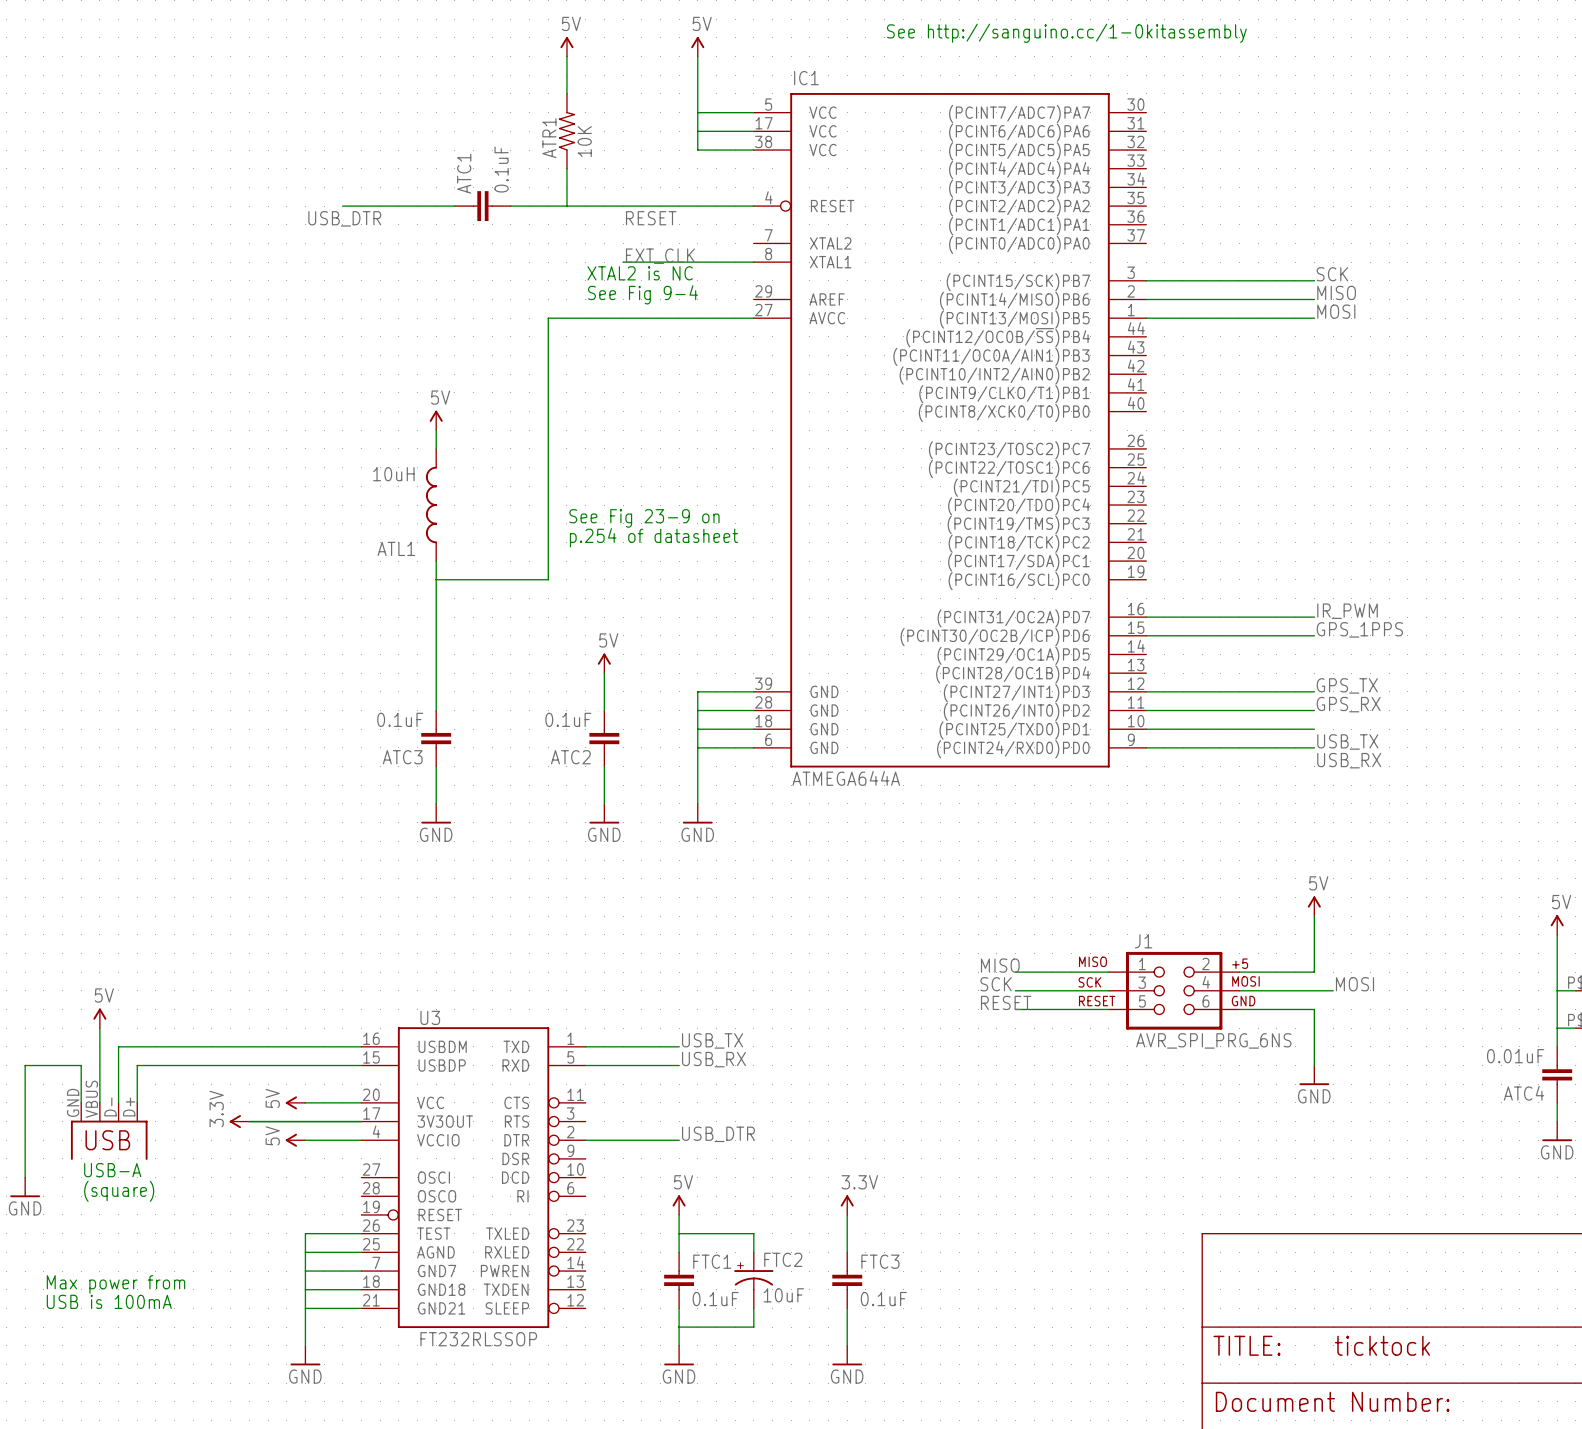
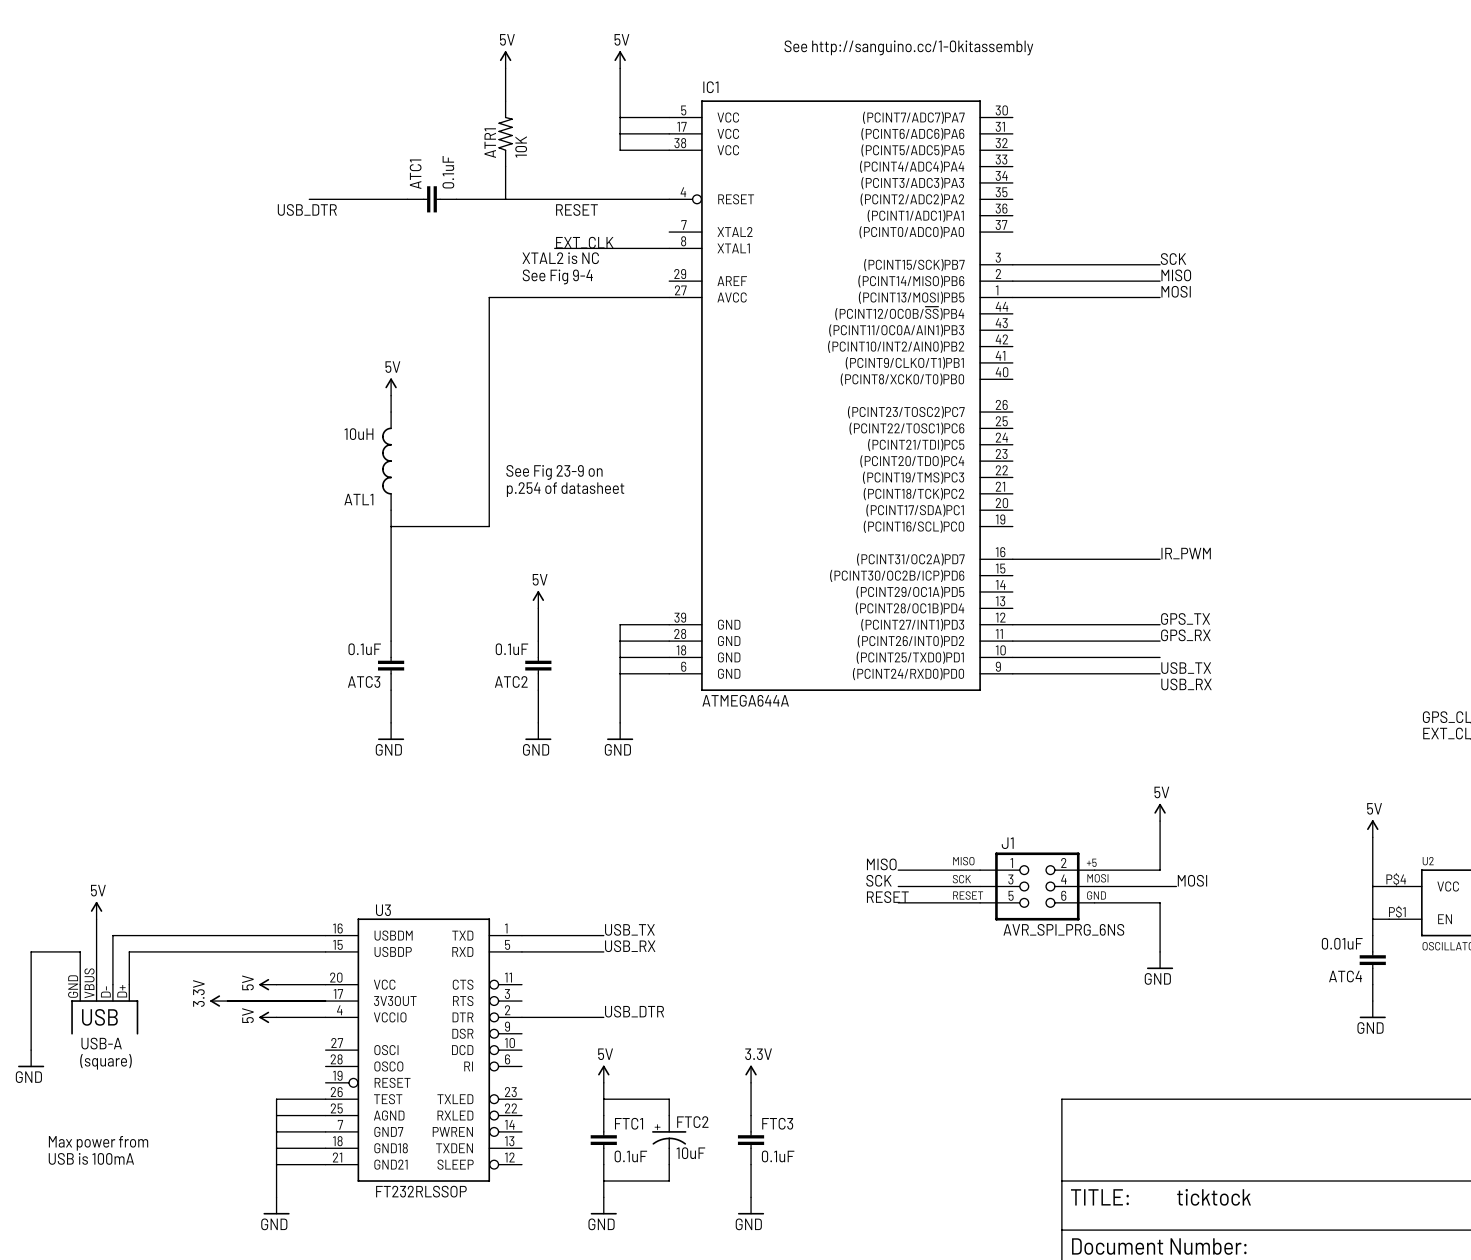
label: GPS_1PPS (1359, 629) -> none
wire: (1146, 635) (1314, 635) -> none

